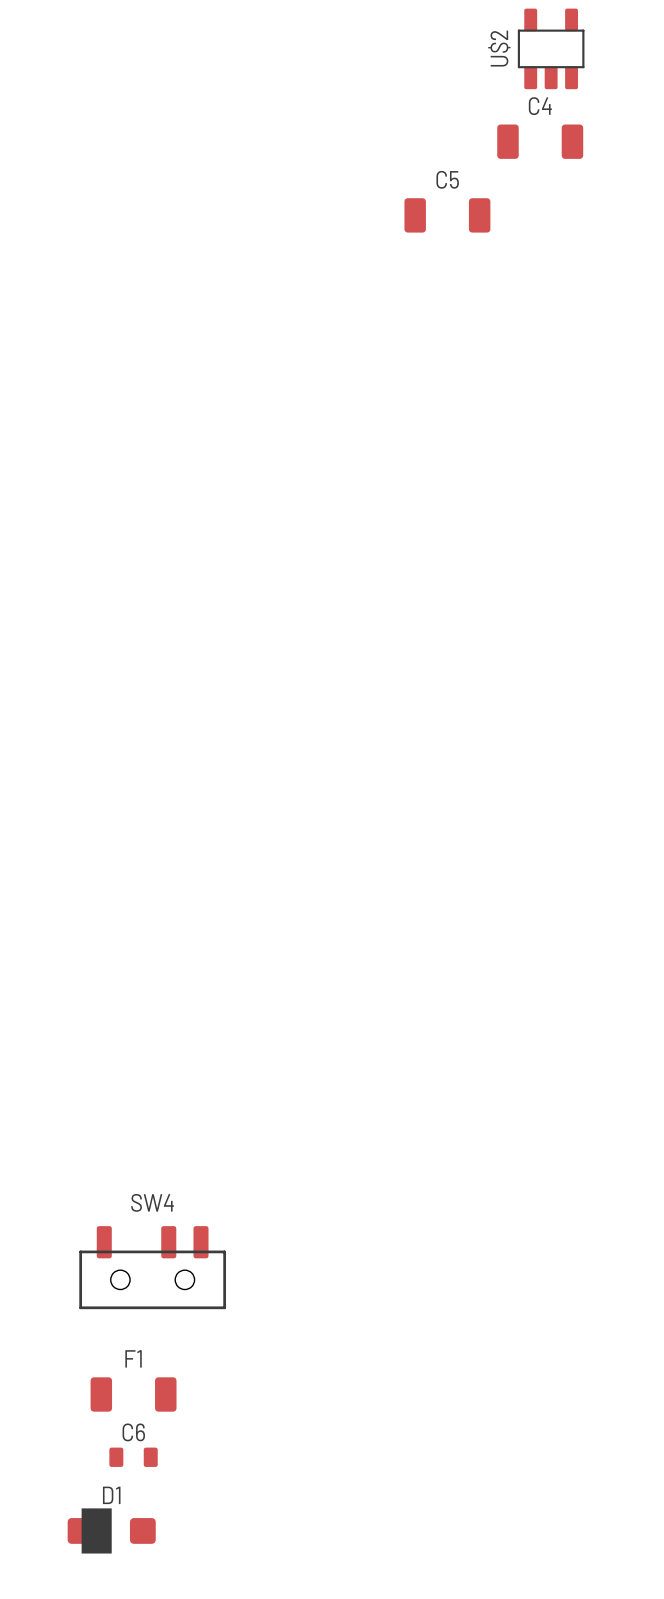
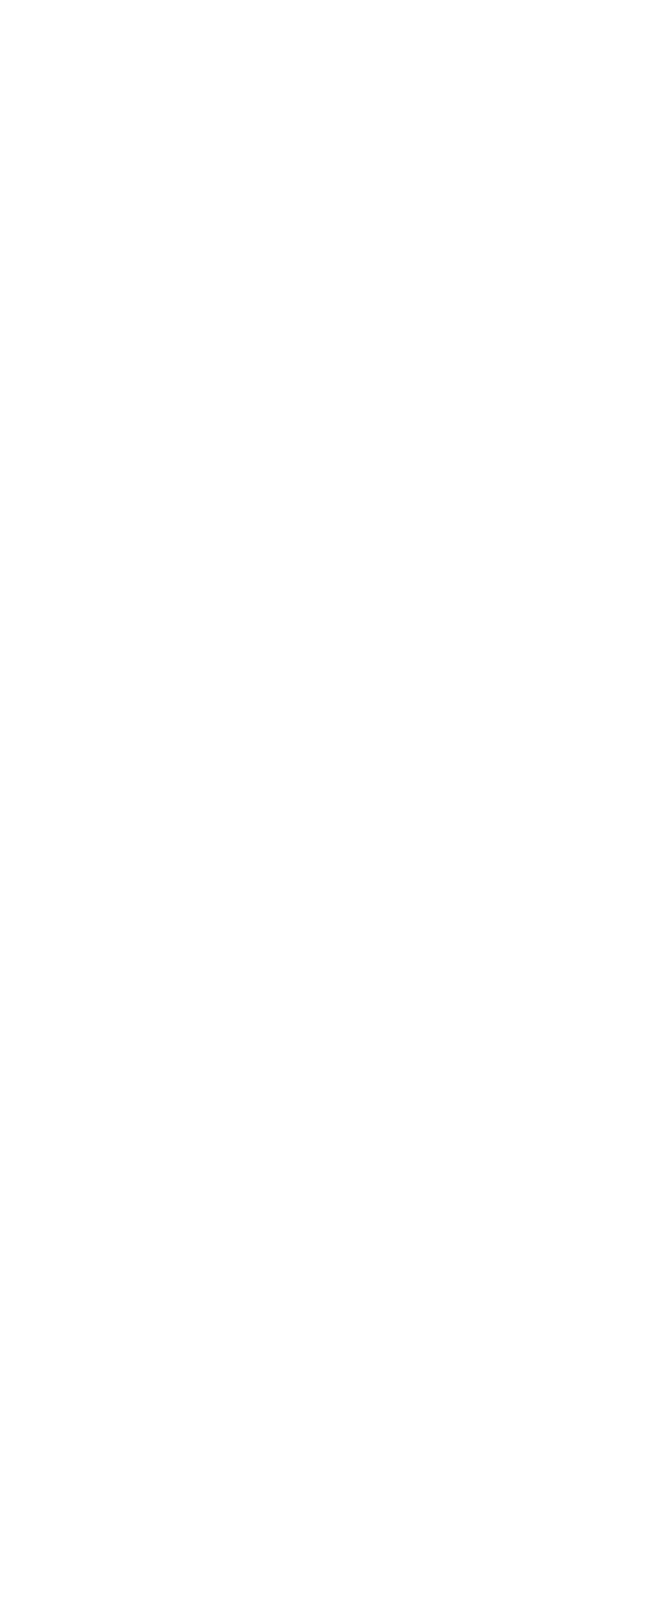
U$2: (551, 48) -> none
C4: (540, 141) -> none
C5: (447, 215) -> none
SW4: (152, 1267) -> none
F1: (133, 1394) -> none
C6: (133, 1457) -> none
D1: (111, 1530) -> none

